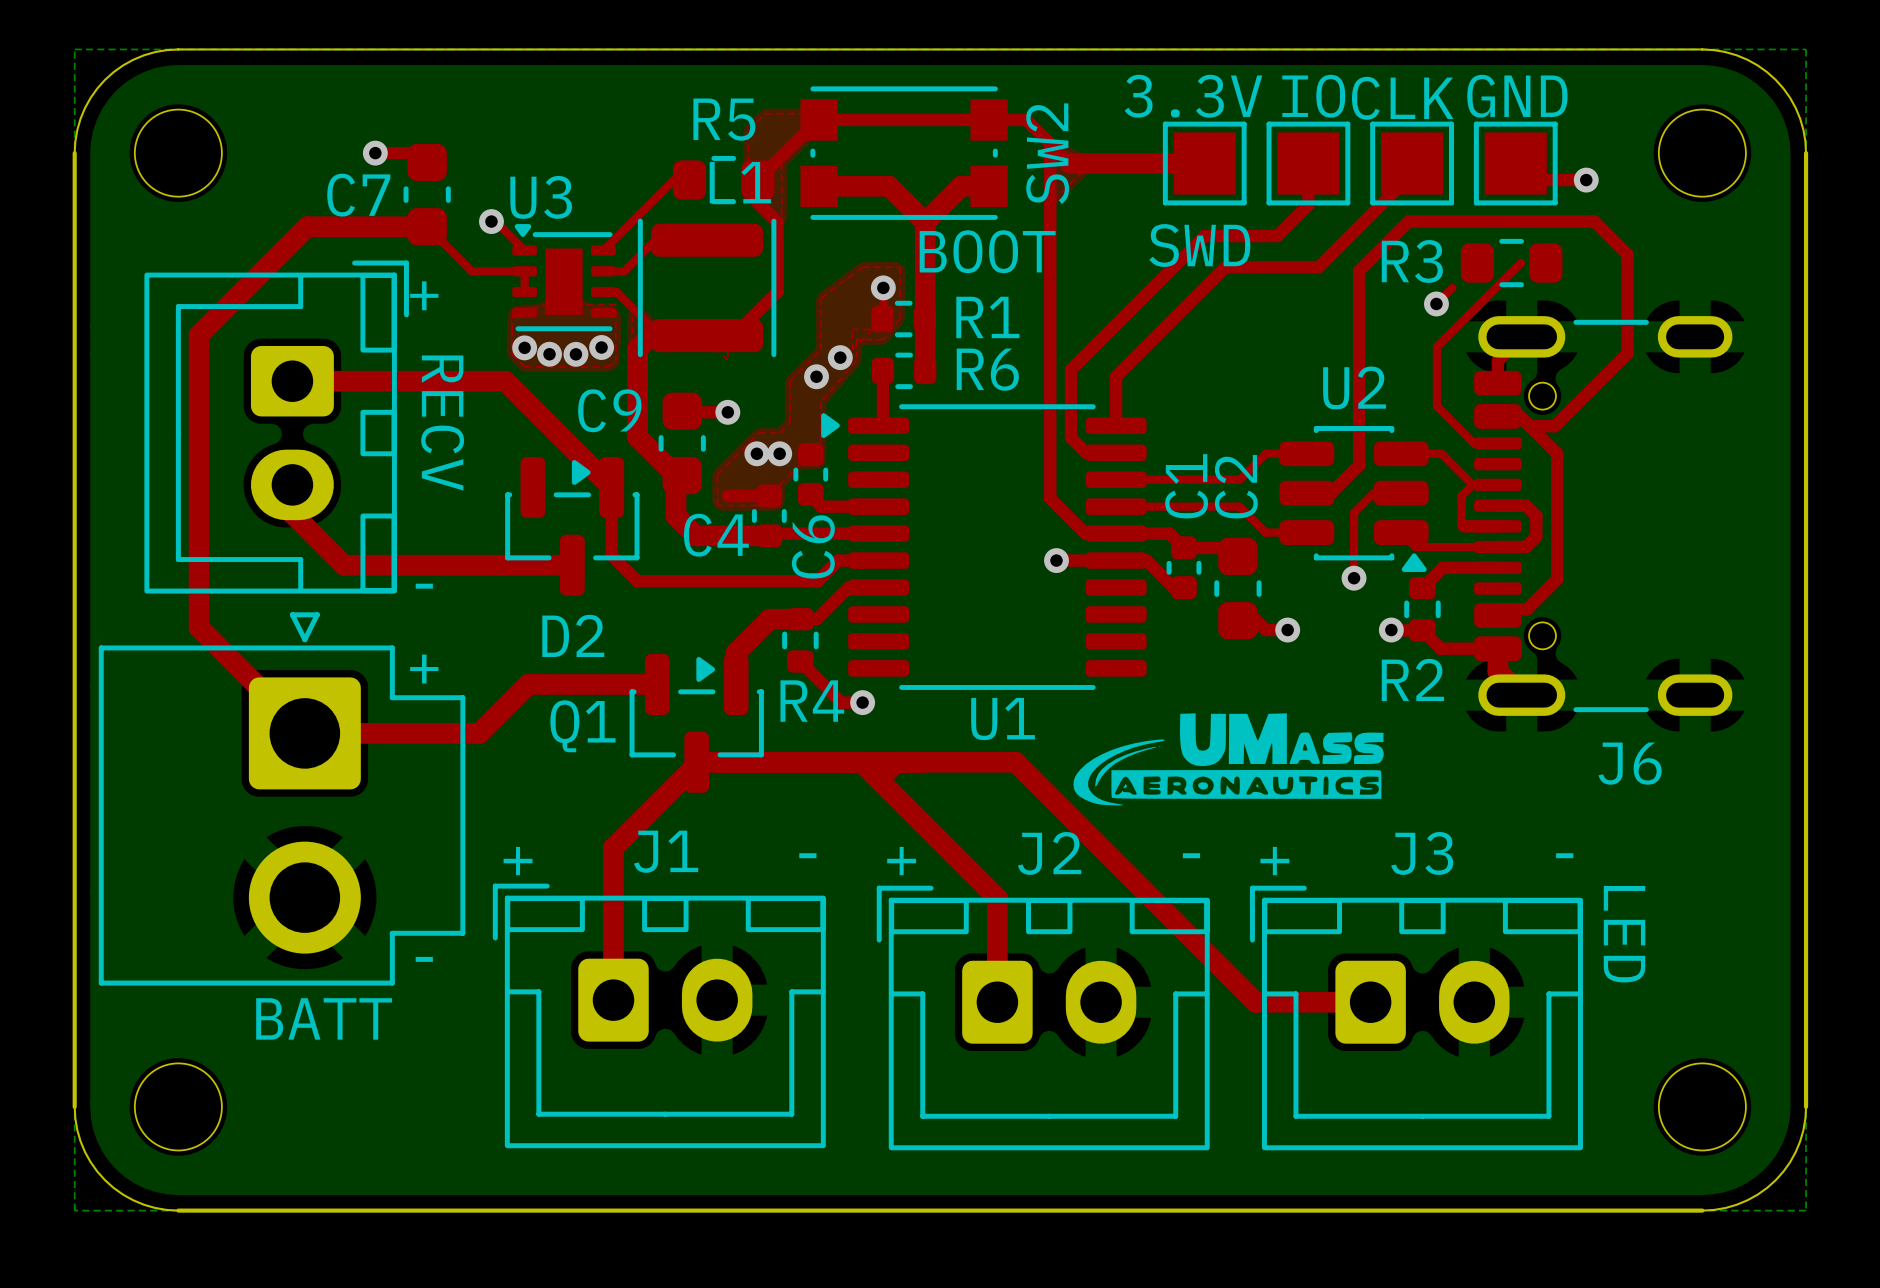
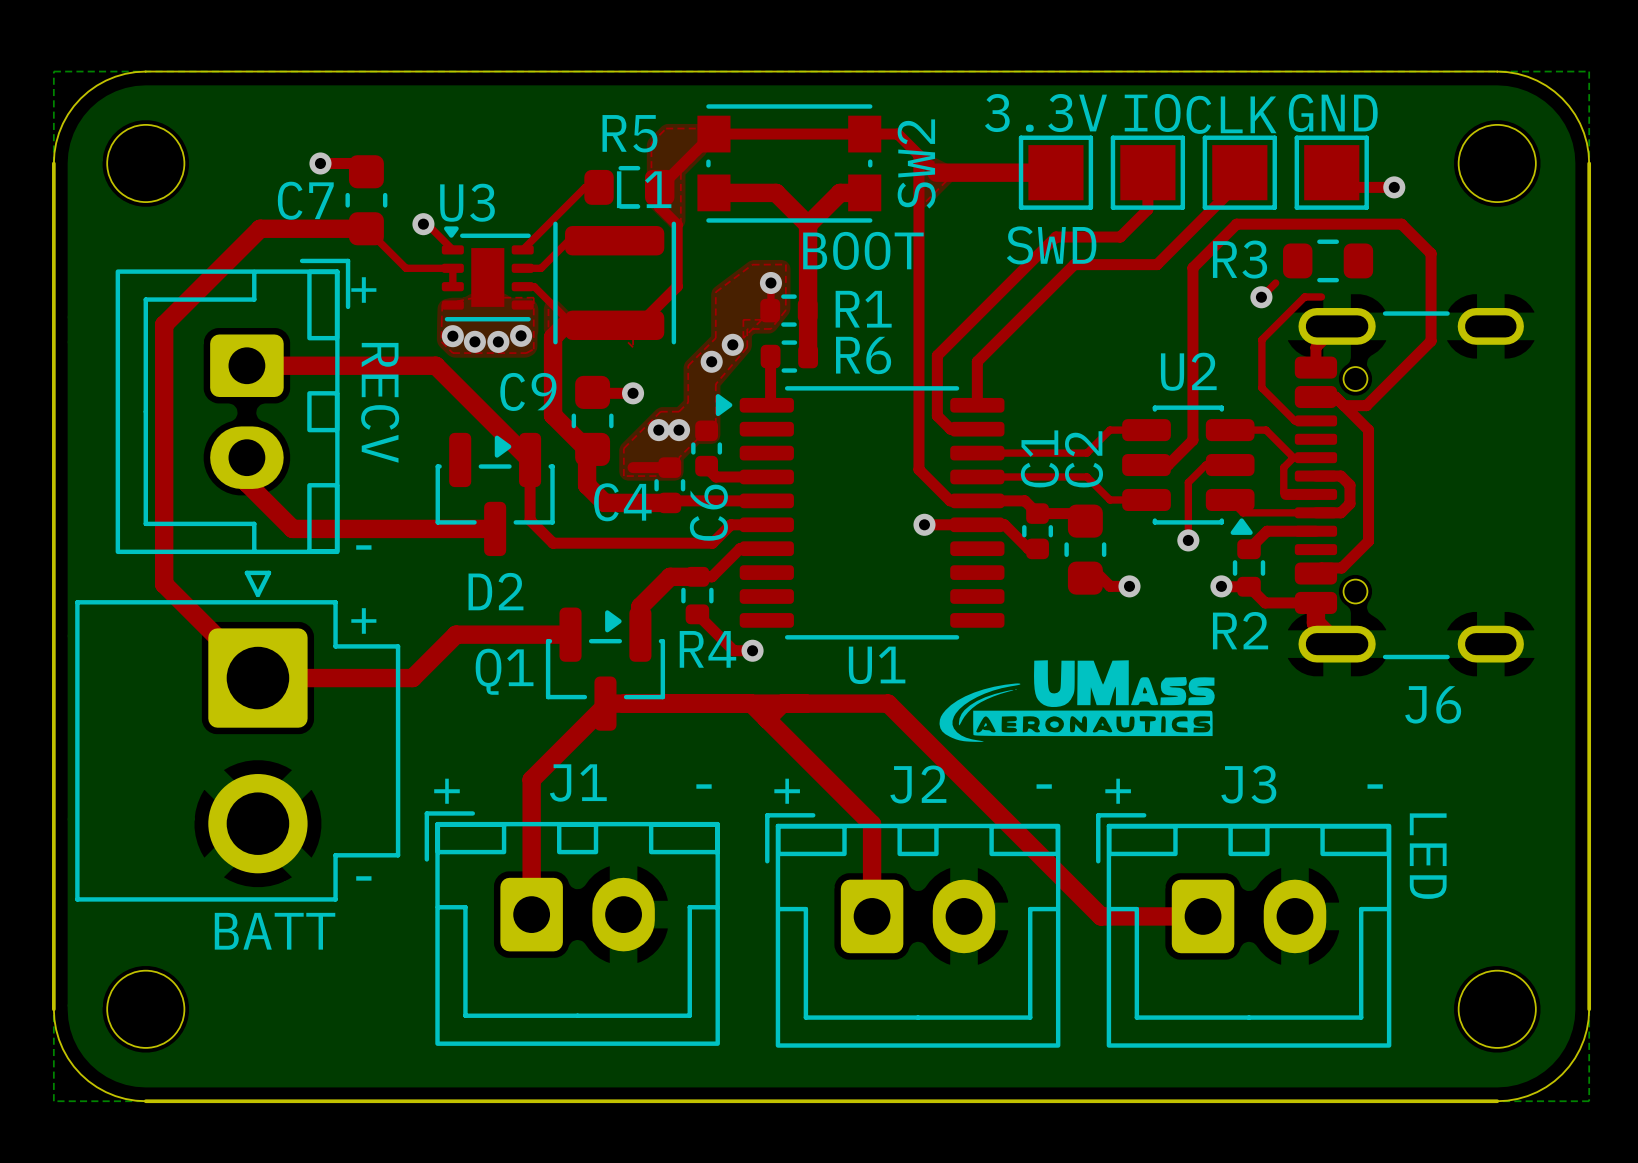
top track: (1520, 263) (1436, 347) (1436, 351) -> (1321, 296) (1304, 296) (1261, 339)

